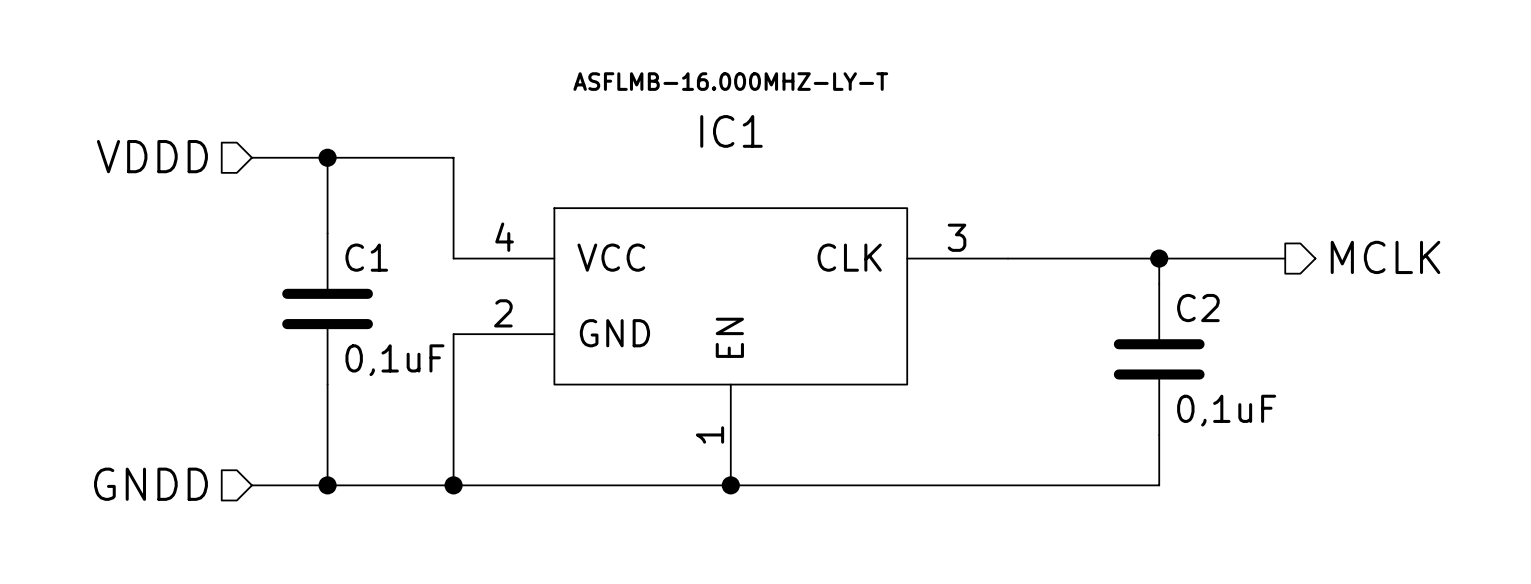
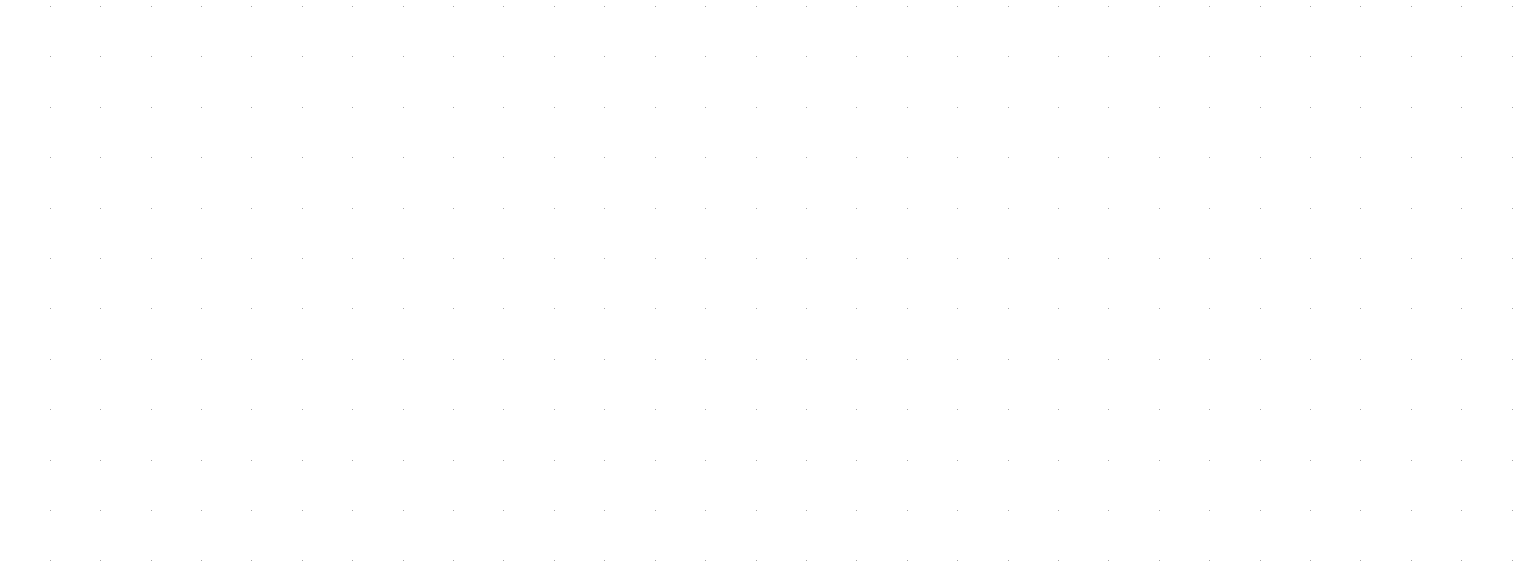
hierarchical label: VDDD (152, 156) -> none
wire: (251, 157) (453, 157) (453, 258) -> none
wire: (327, 157) (327, 233) -> none
junction: (327, 157) -> none
hierarchical label: MCLK (1385, 257) -> none
wire: (1008, 258) (1285, 258) -> none
wire: (1159, 258) (1159, 283) -> none
junction: (1159, 258) -> none
C1: 0,1uF (327, 308) -> none
wire: (453, 334) (453, 485) -> none
IC1: ASFLMB-16.000MHZ-LY-T (730, 346) -> none
C2: 0,1uF (1159, 359) -> none
wire: (327, 384) (327, 485) -> none
wire: (1159, 434) (1159, 485) (251, 485) -> none
hierarchical label: GNDD (150, 484) -> none
junction: (327, 485) -> none
junction: (453, 485) -> none
junction: (730, 485) -> none

